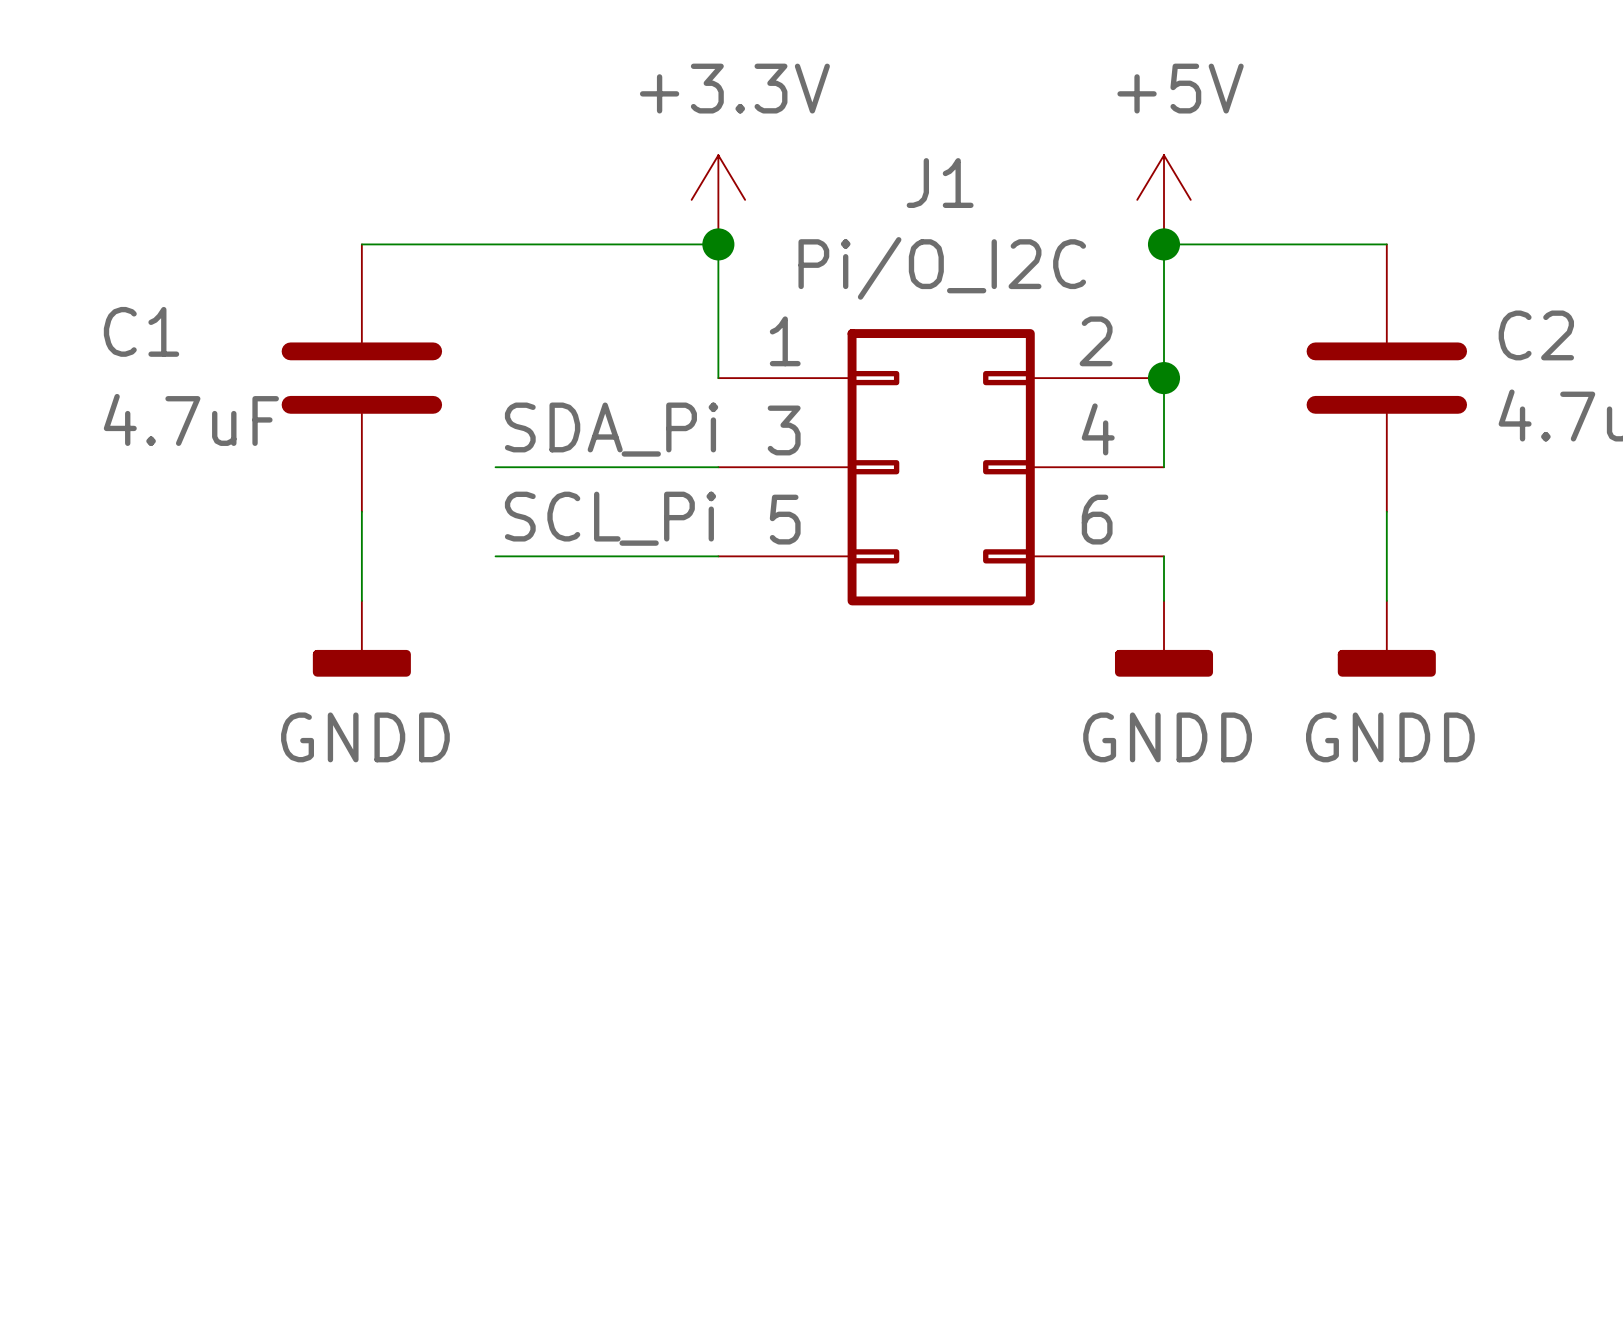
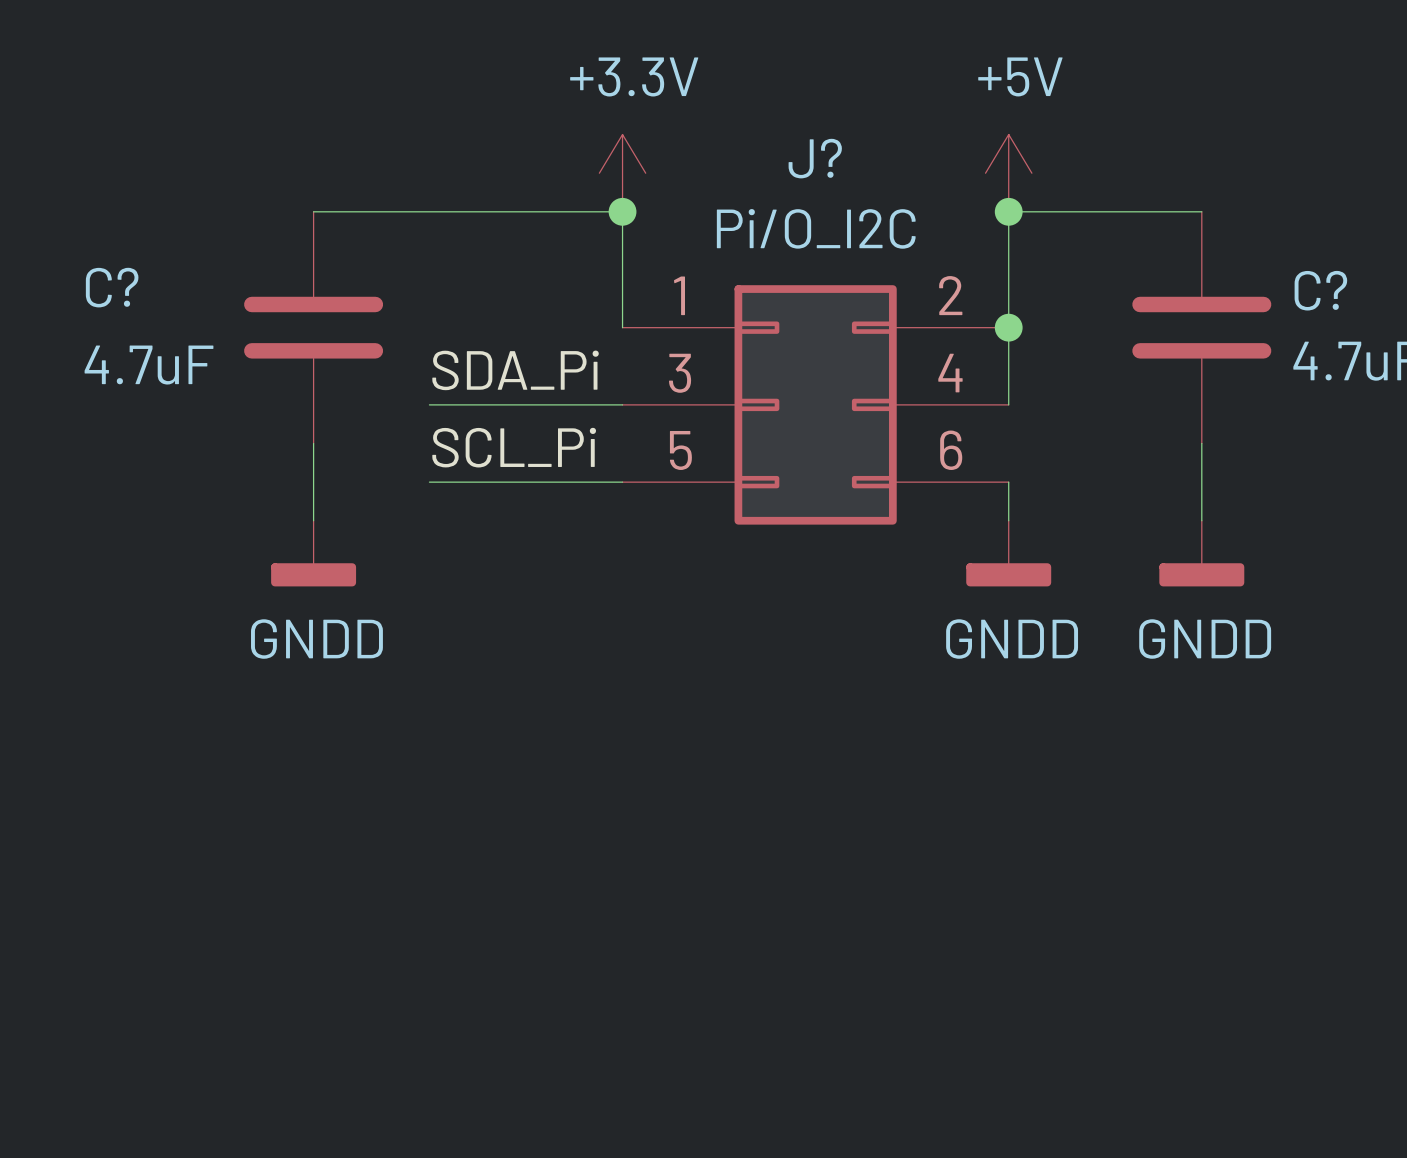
J1 name: J1 (940, 183) -> J? (815, 158)
C1 name: C1 (141, 331) -> C? (112, 287)
C2 name: C2 (1536, 335) -> C? (1320, 290)

